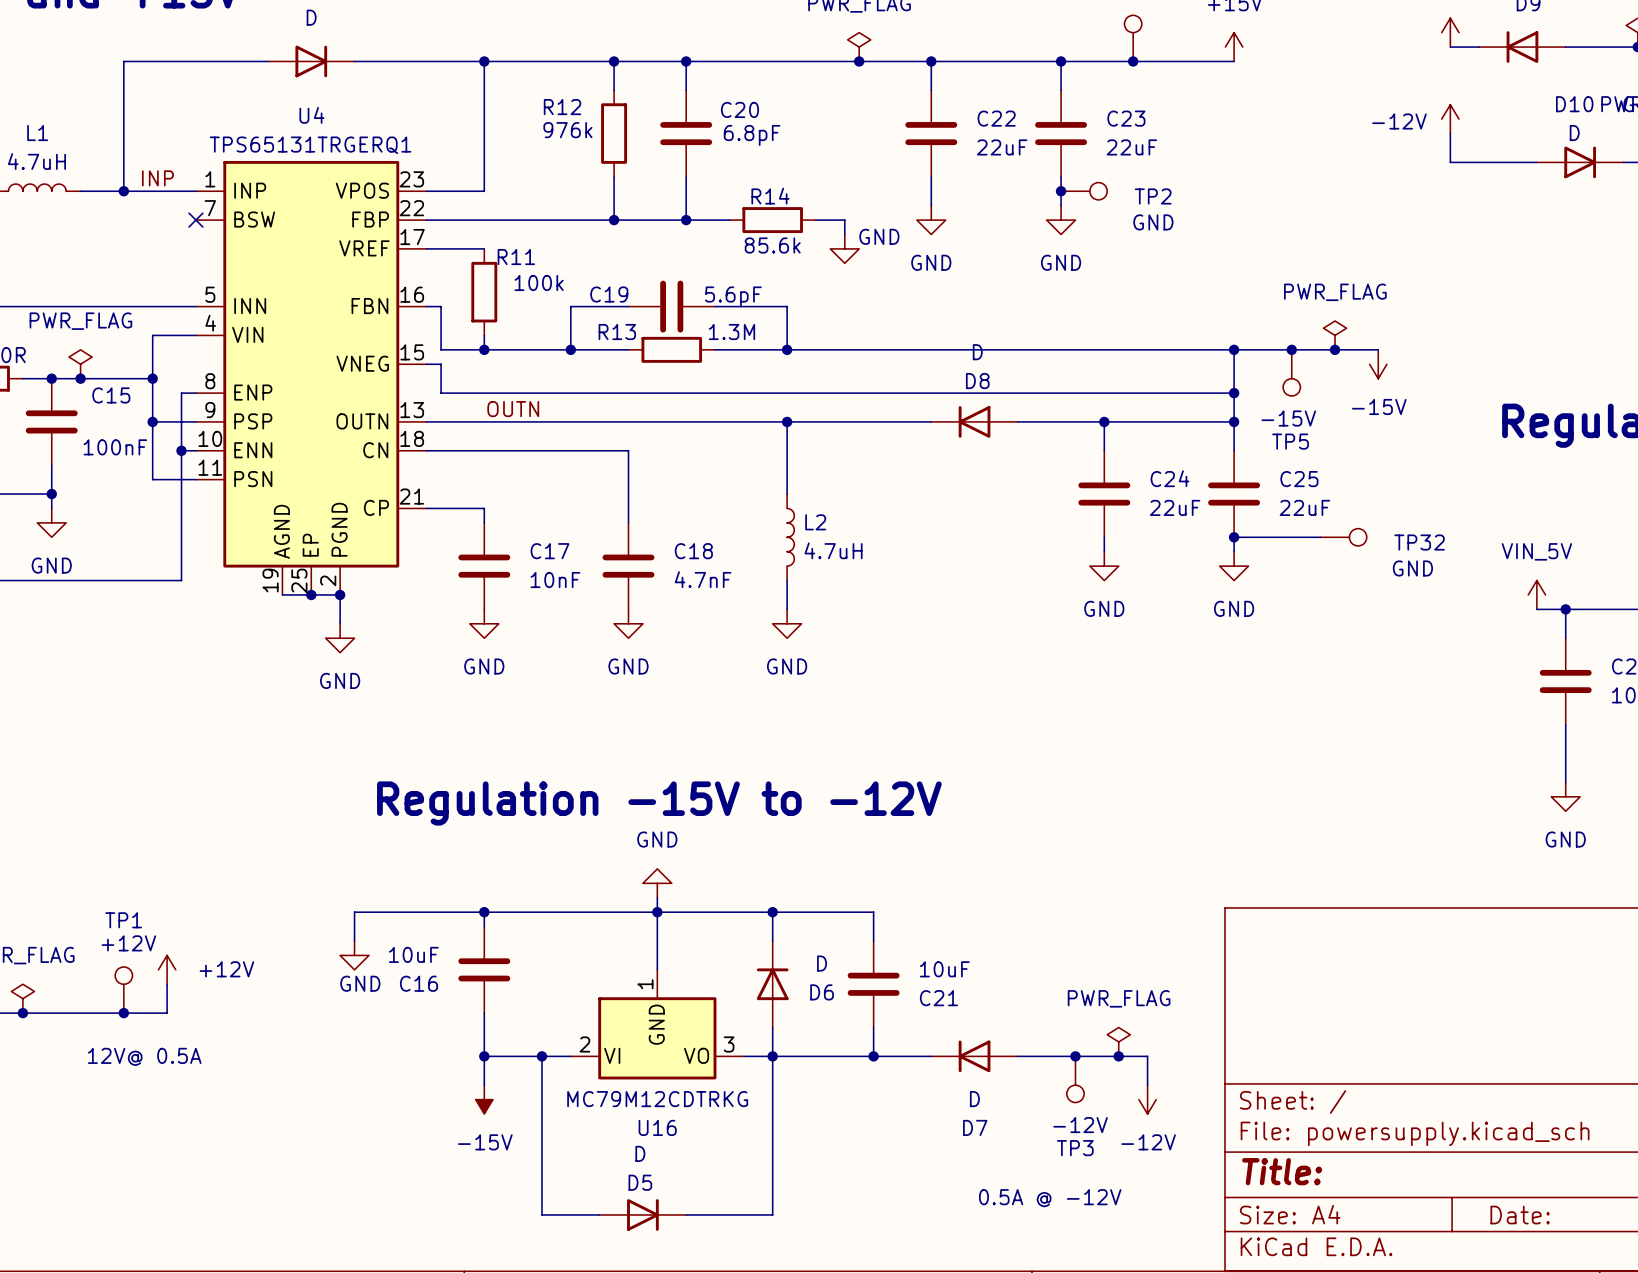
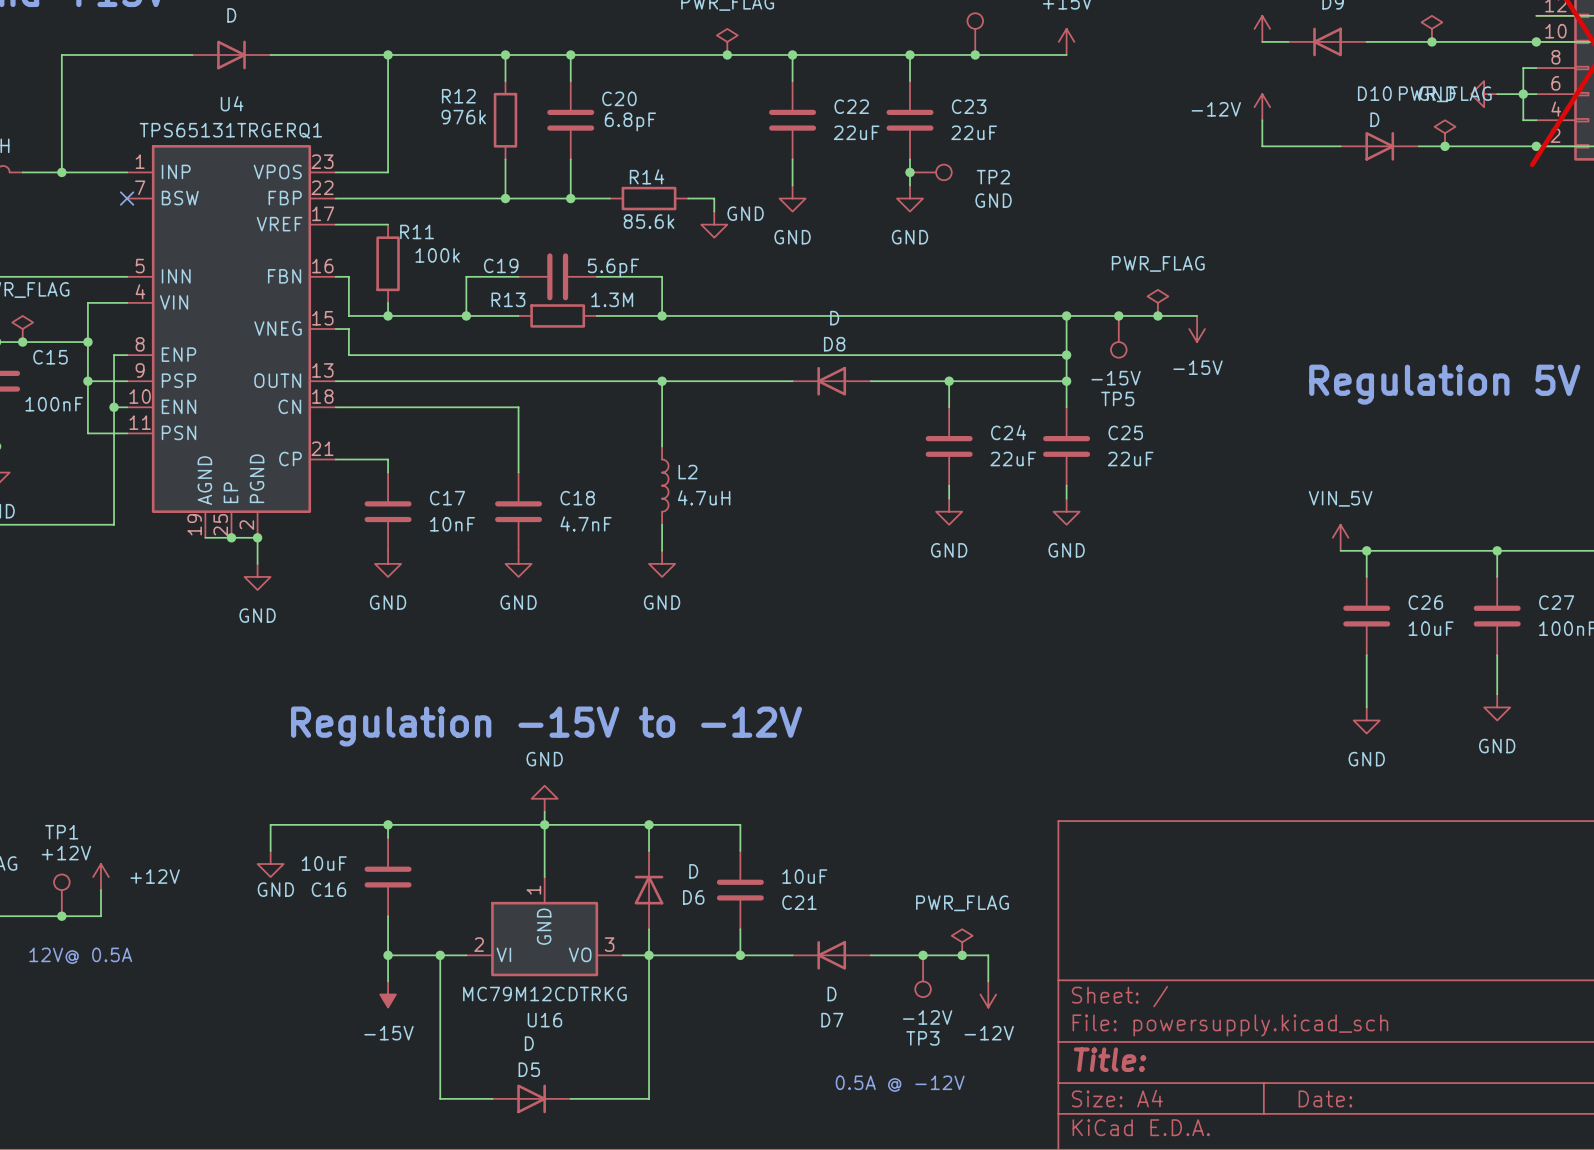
label: INP (157, 178) -> none
label: OUTN (513, 409) -> none
wire: (1234, 537) (1320, 537) -> none
junction: (1234, 537) -> none
TP32: GND (1343, 537) -> none

